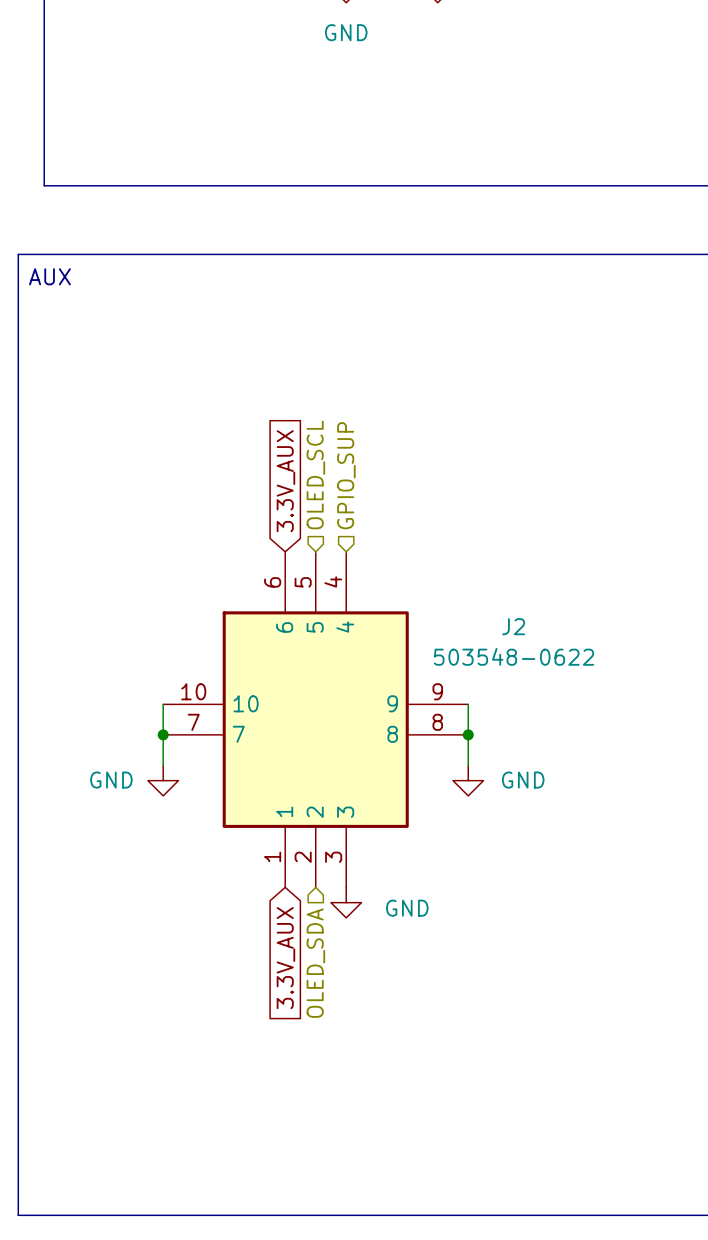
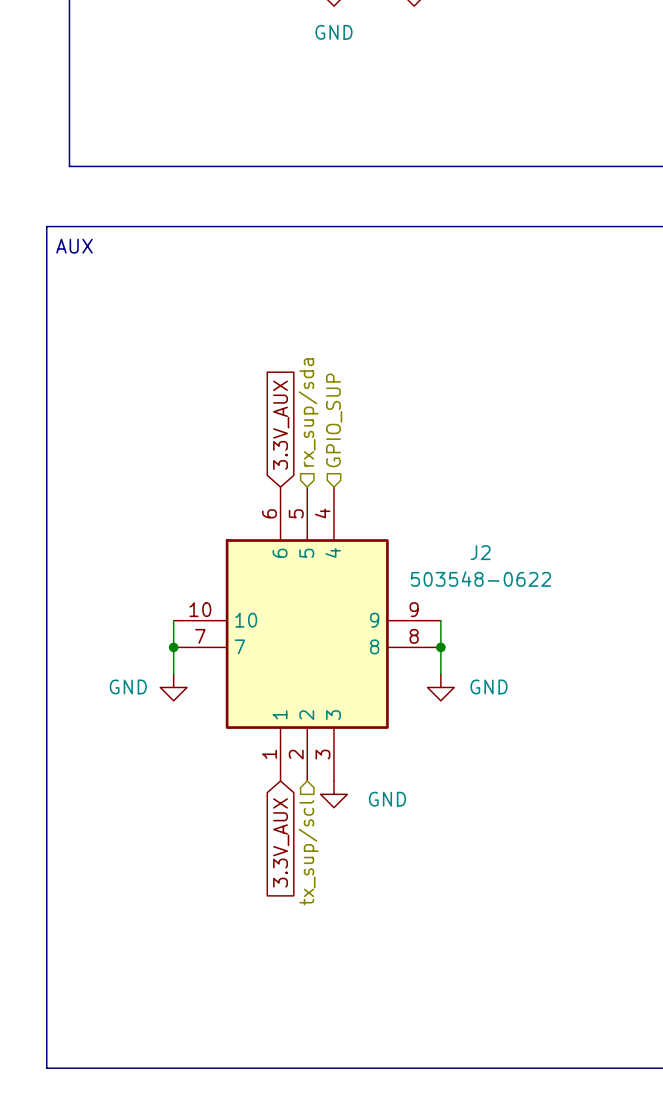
hierarchical label: OLED_SCL (315, 474) -> rx_sup/sda (308, 412)
hierarchical label: OLED_SDA (315, 963) -> tx_sup/scl (308, 852)

